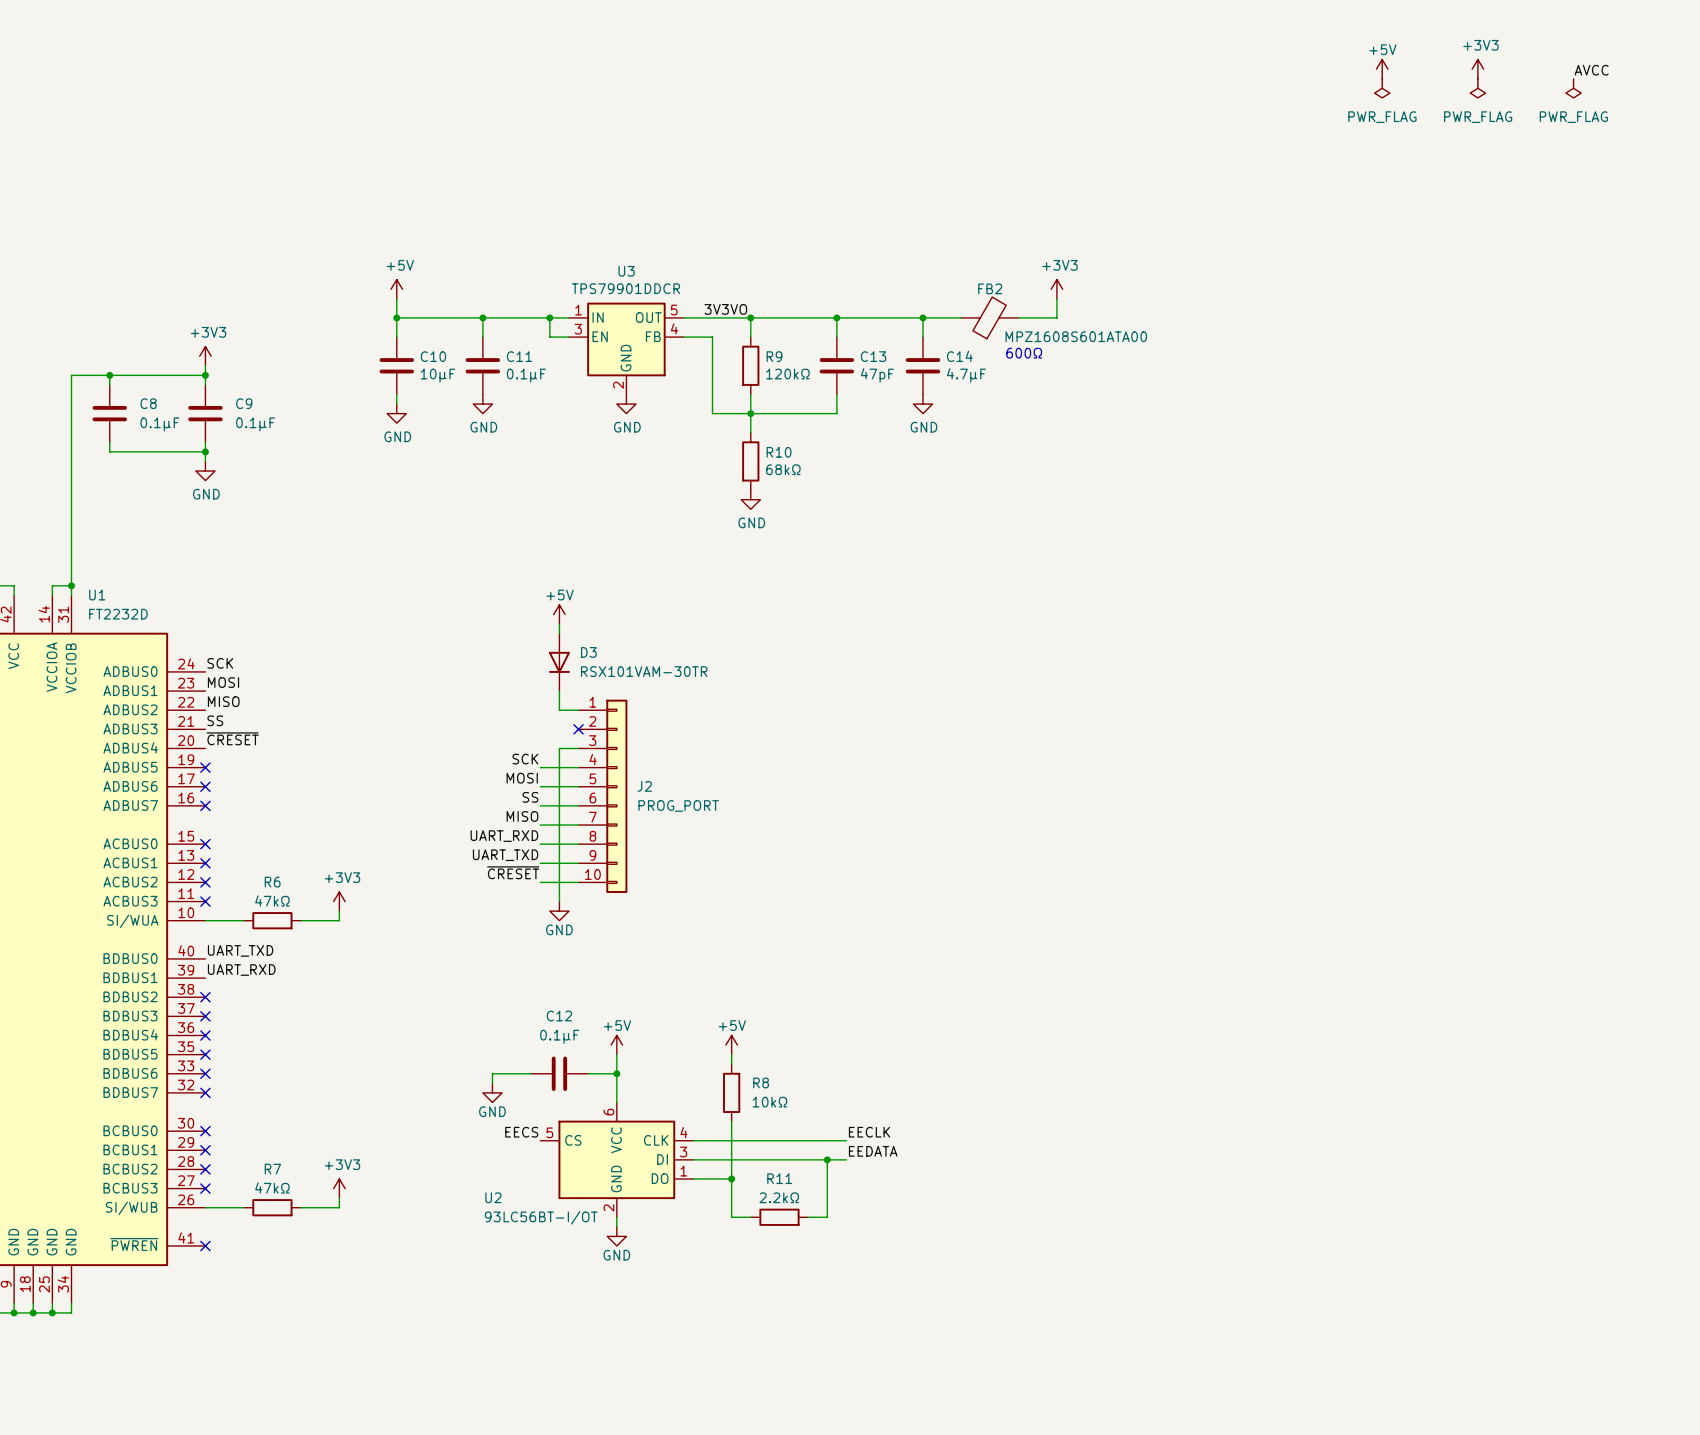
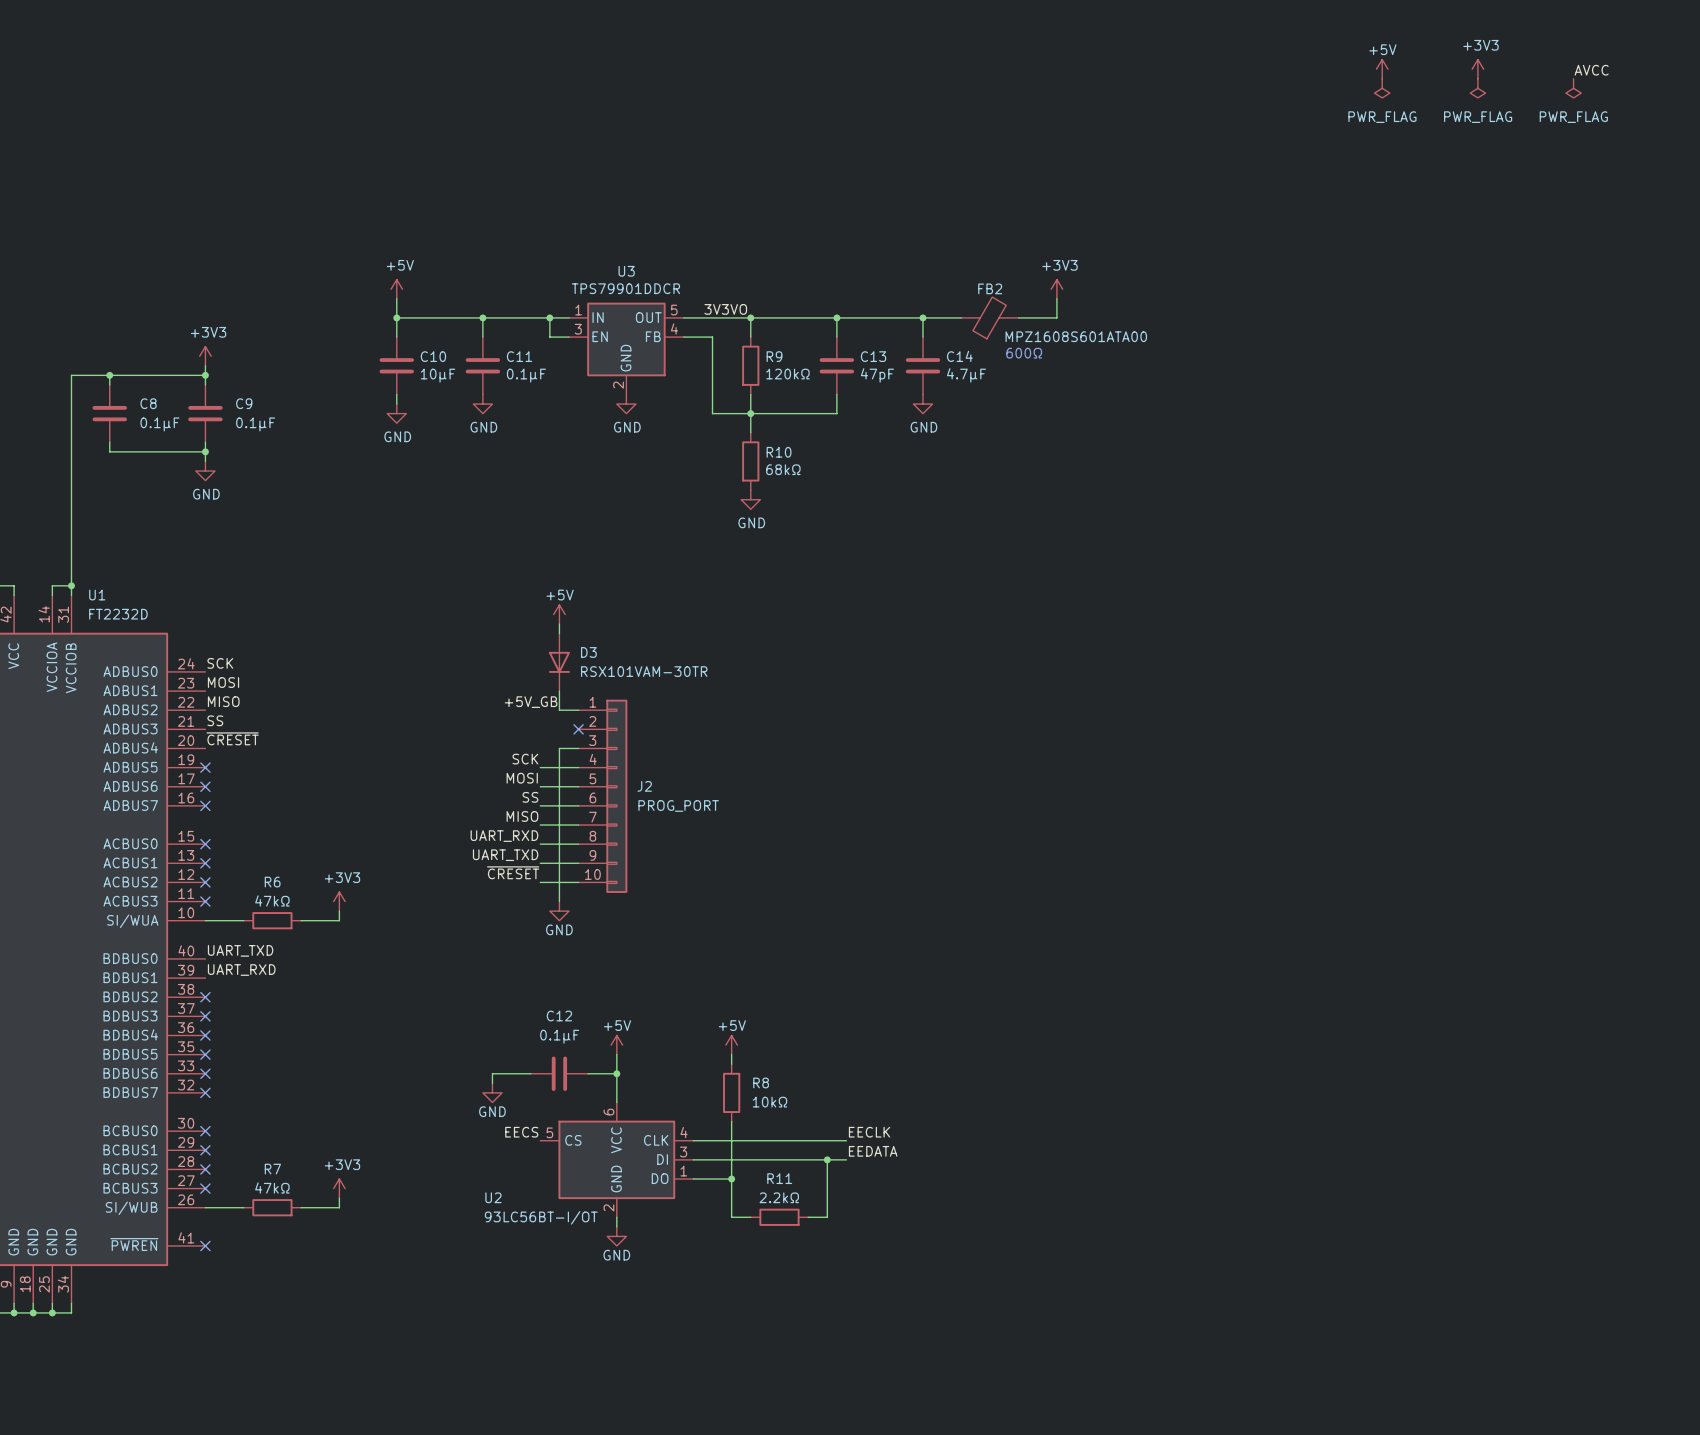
label: none -> +5V_GB (531, 702)

